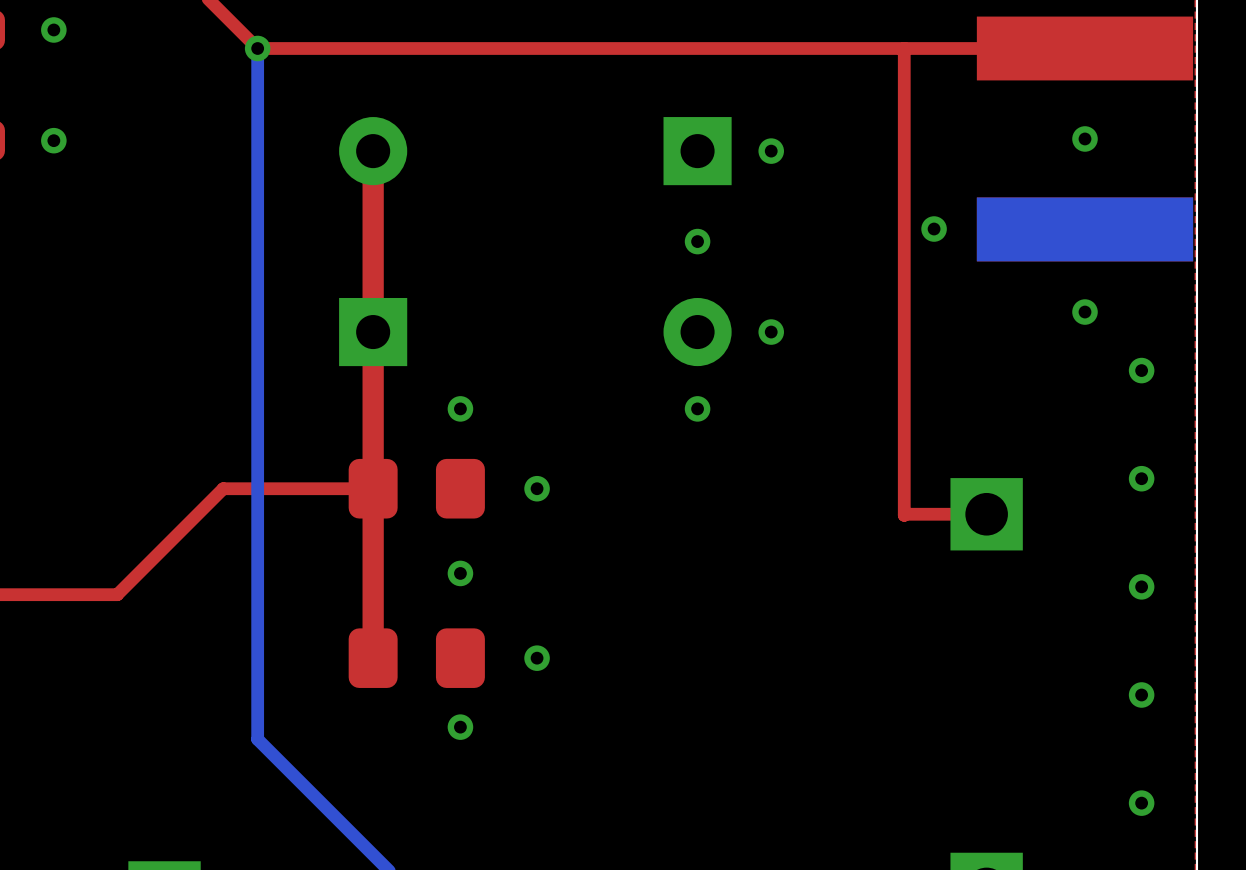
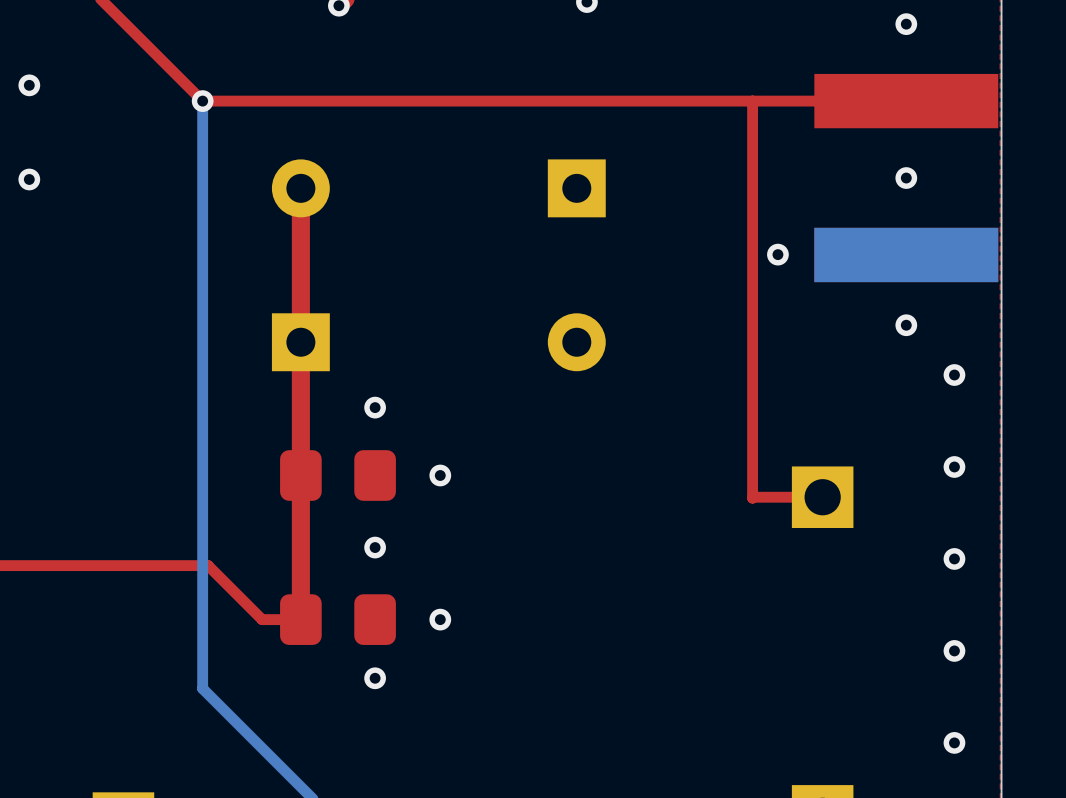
via: (771, 151) -> none
via: (697, 241) -> none
via: (771, 332) -> none
via: (697, 408) -> none
top track: (373, 488) (223, 488) (117, 594) -> (300, 619) (262, 619) (208, 565) (83, 565)

